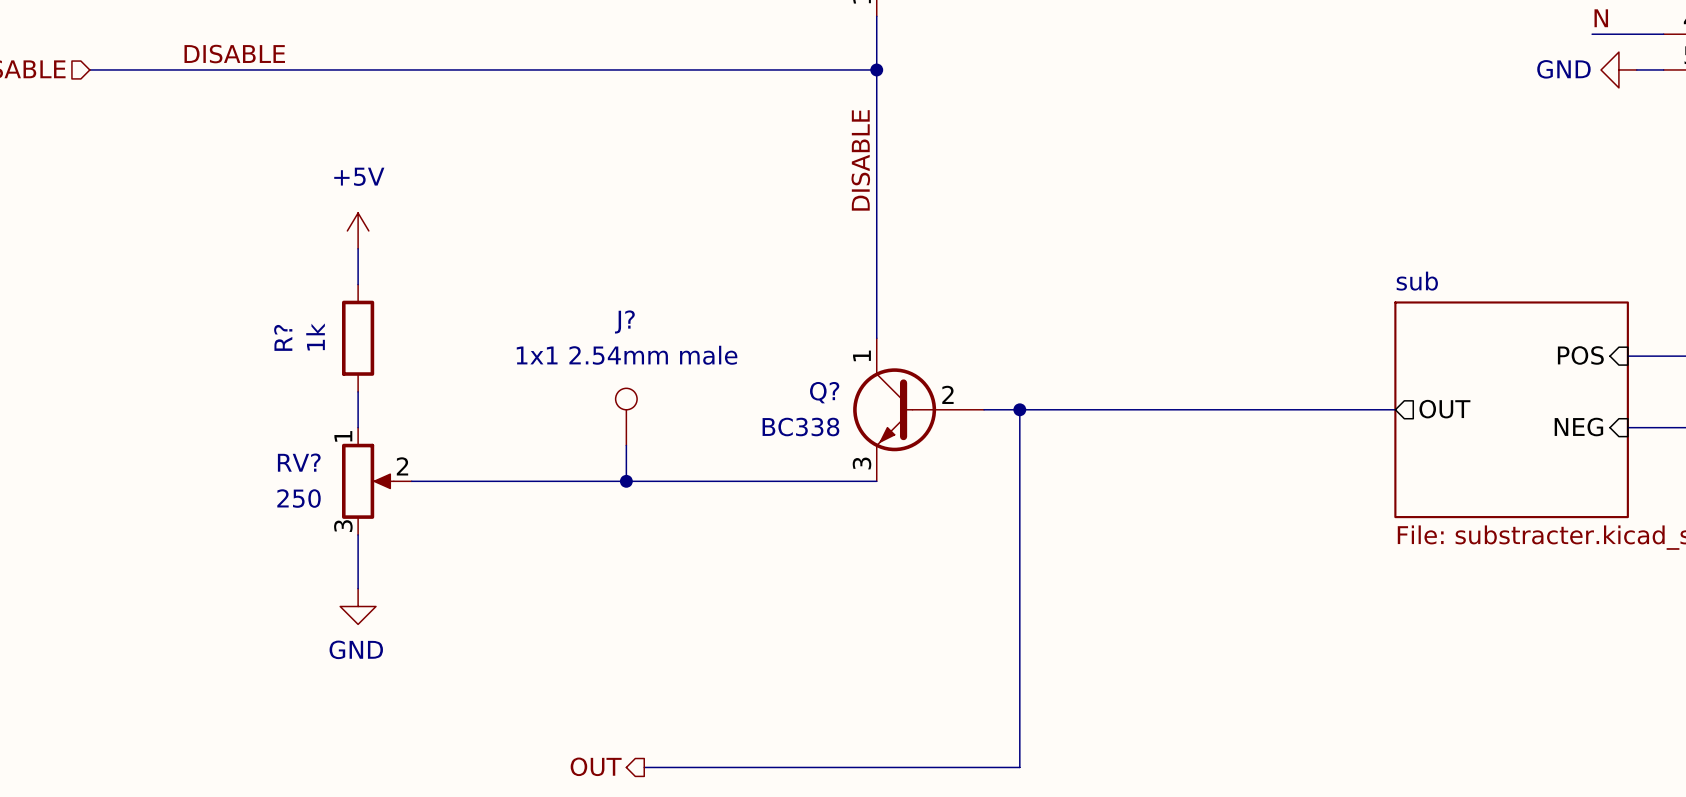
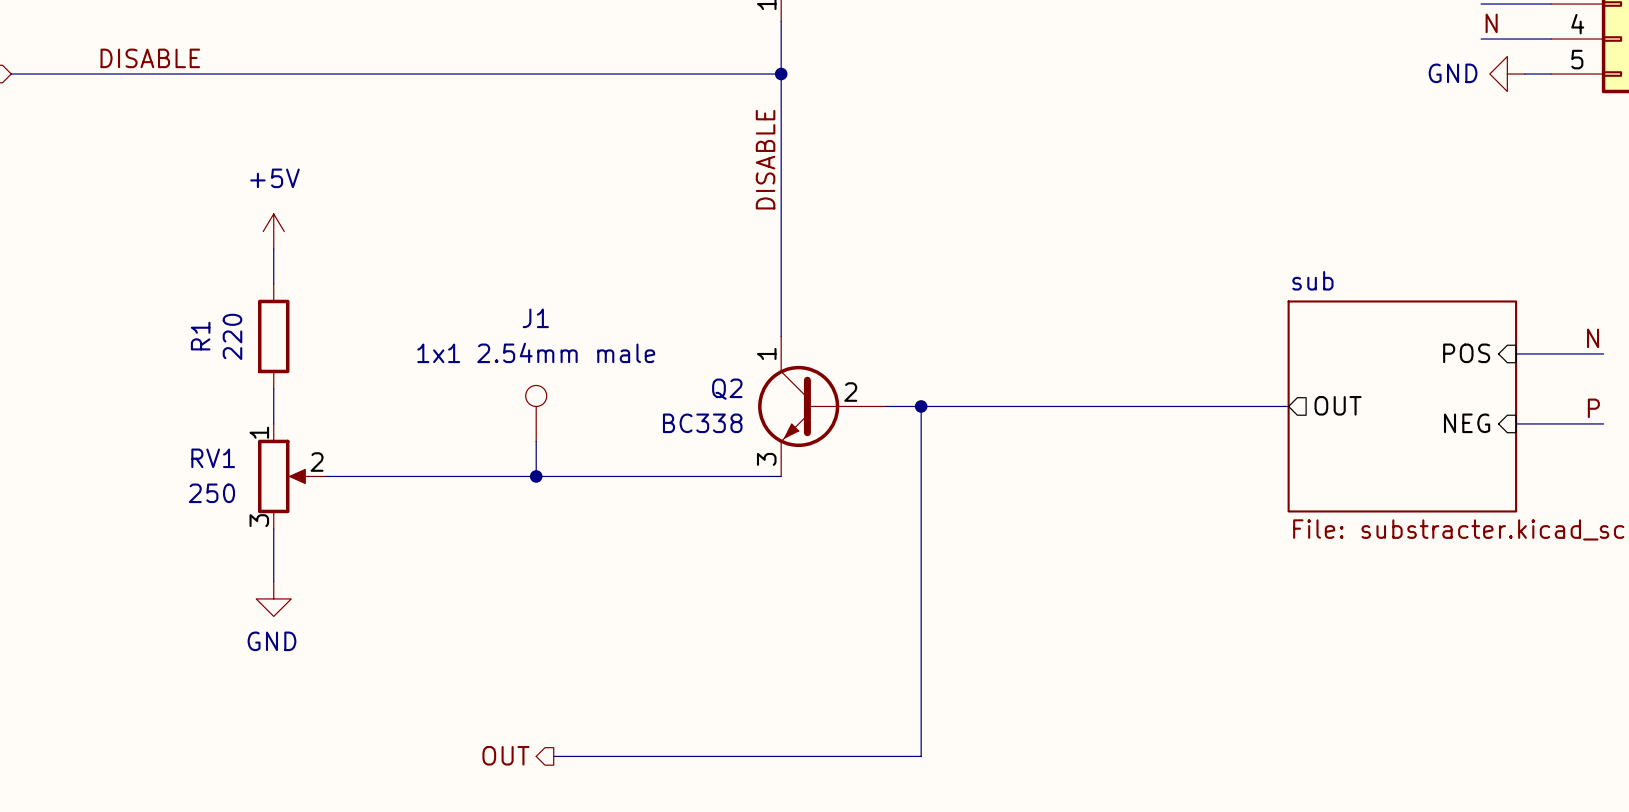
J? name: J? (624, 321) -> J1 (535, 318)
R? value: 1k (315, 336) -> 220 (232, 336)
R? name: R? (283, 337) -> R1 (200, 336)
Q? name: Q? (824, 392) -> Q2 (727, 389)
RV? name: RV? (299, 462) -> RV1 (213, 458)

